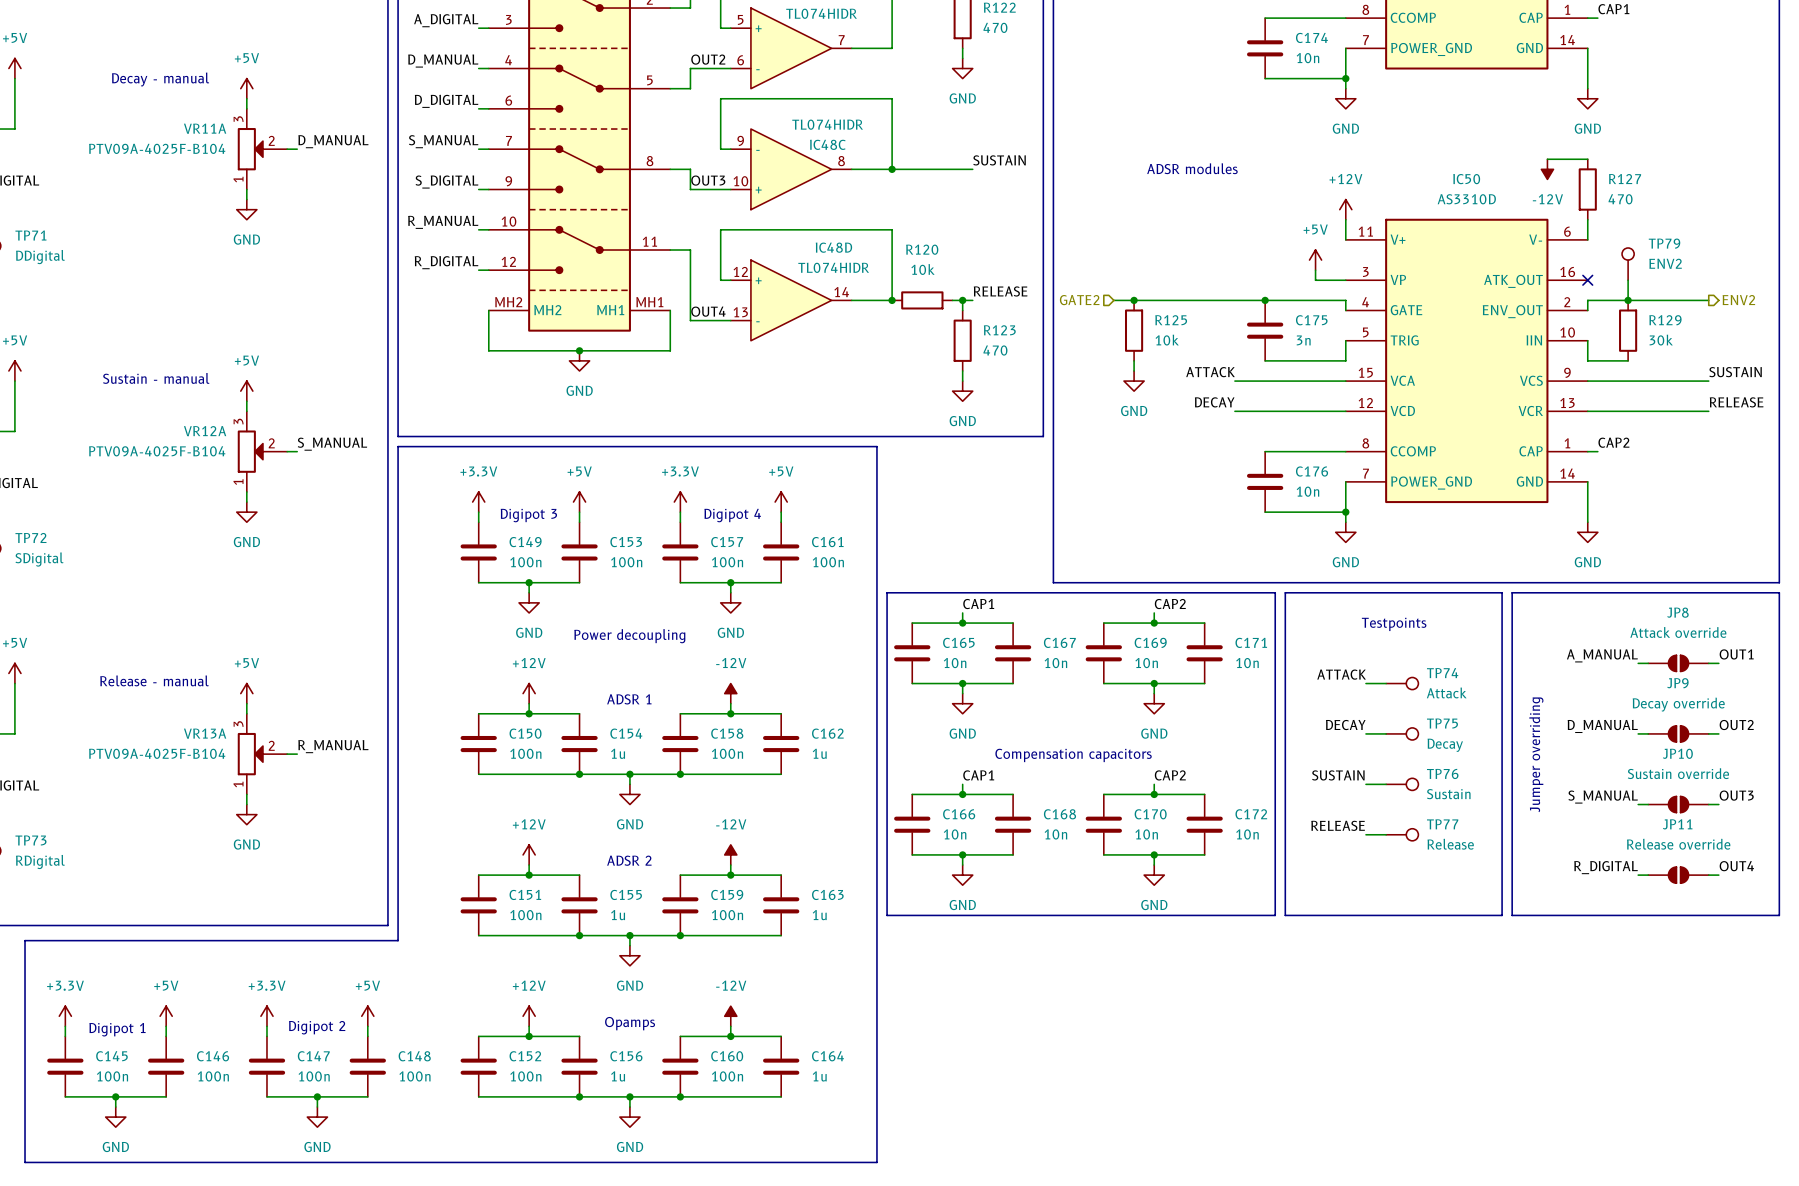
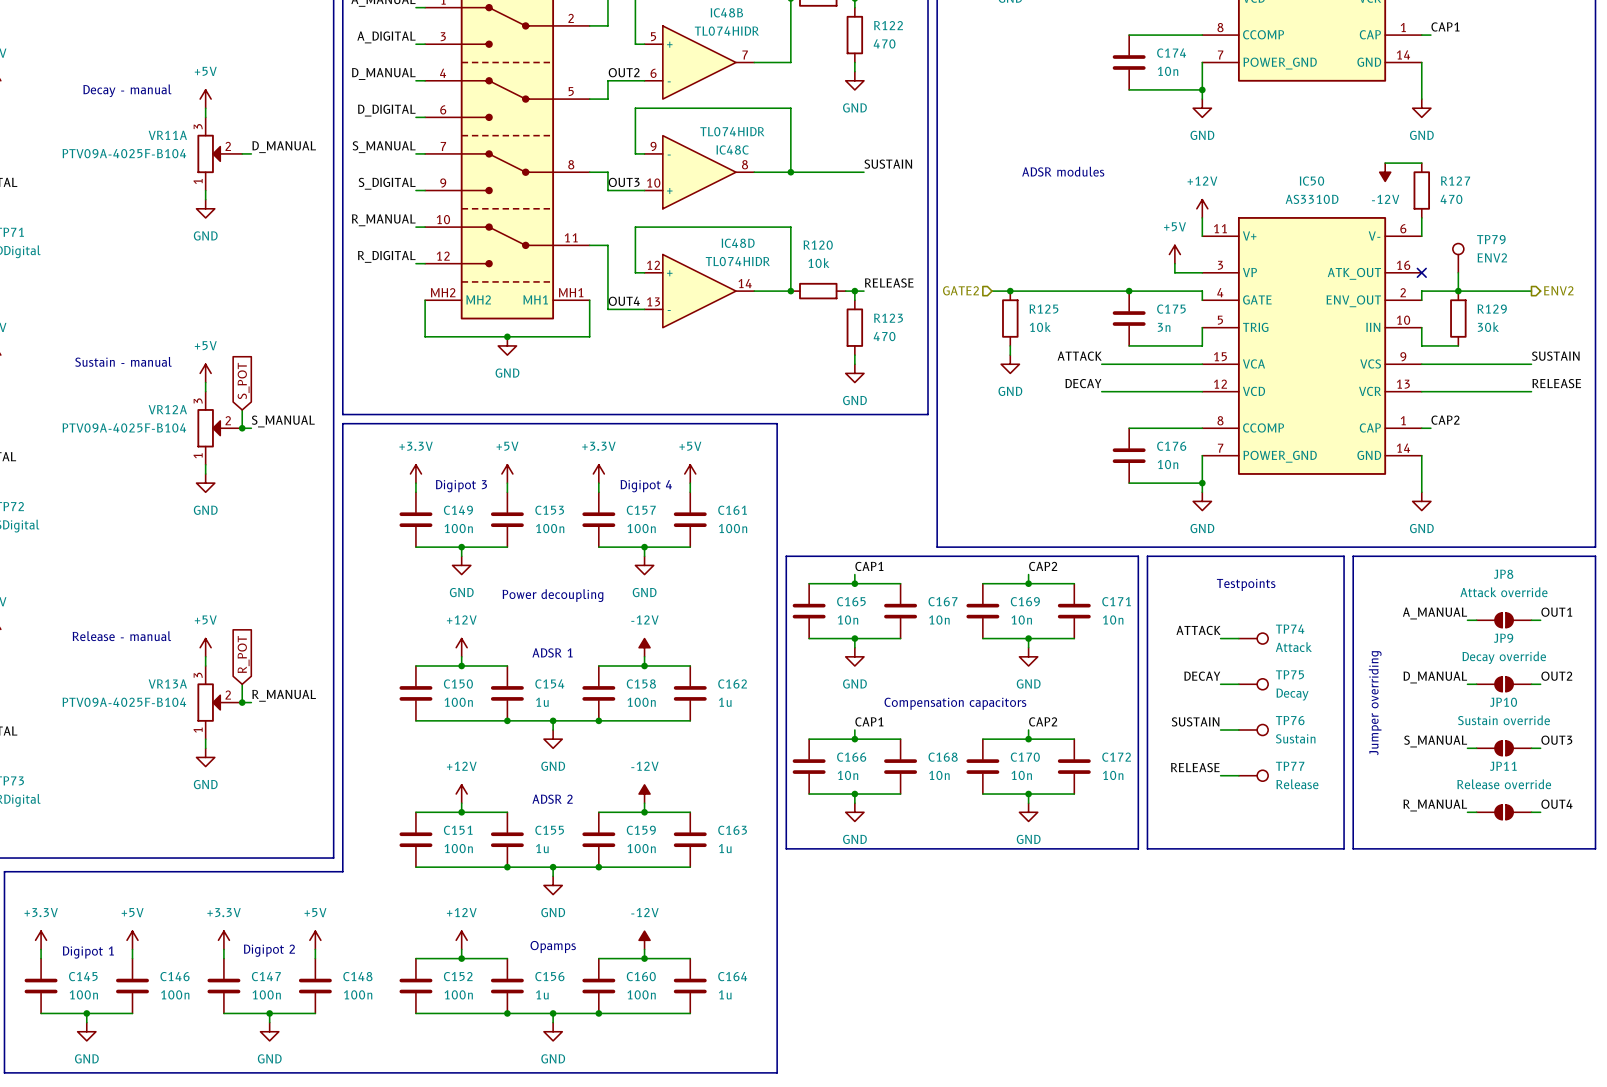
global label: none -> S_POT (243, 381)
wire: none -> (242, 409) (242, 428)
junction: none -> (242, 428)
global label: none -> R_POT (243, 654)
wire: none -> (242, 684) (242, 702)
junction: none -> (242, 702)
label: R_DIGITAL (1605, 867) -> R_MANUAL (1435, 805)

